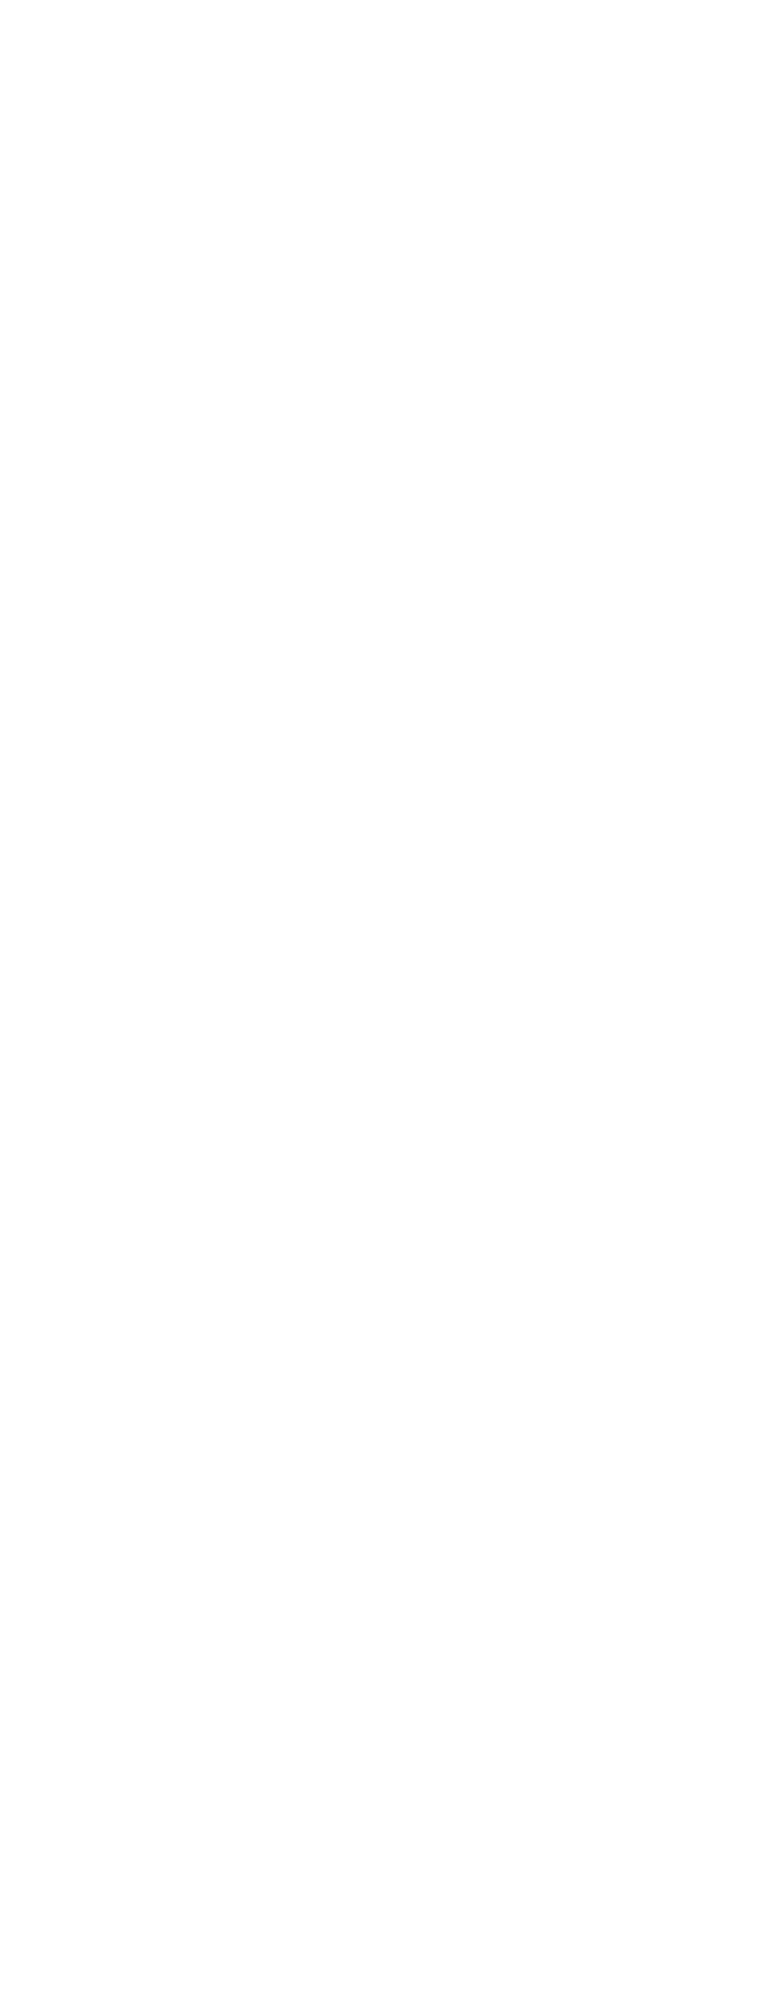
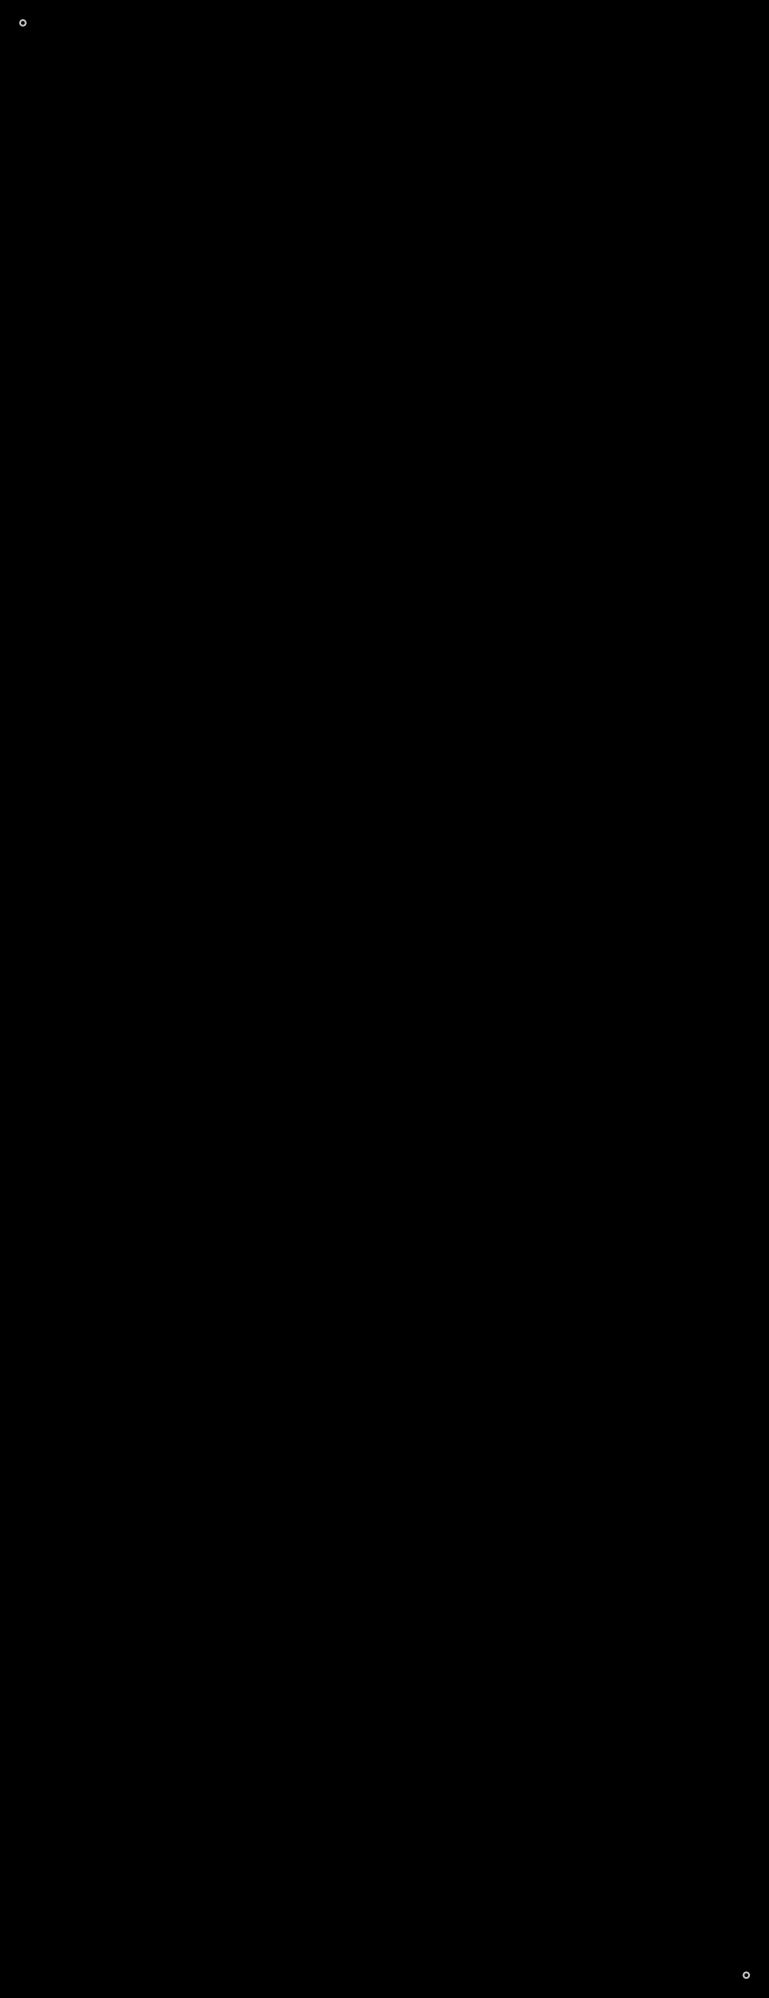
via: none -> (22, 22)
via: none -> (746, 1975)

